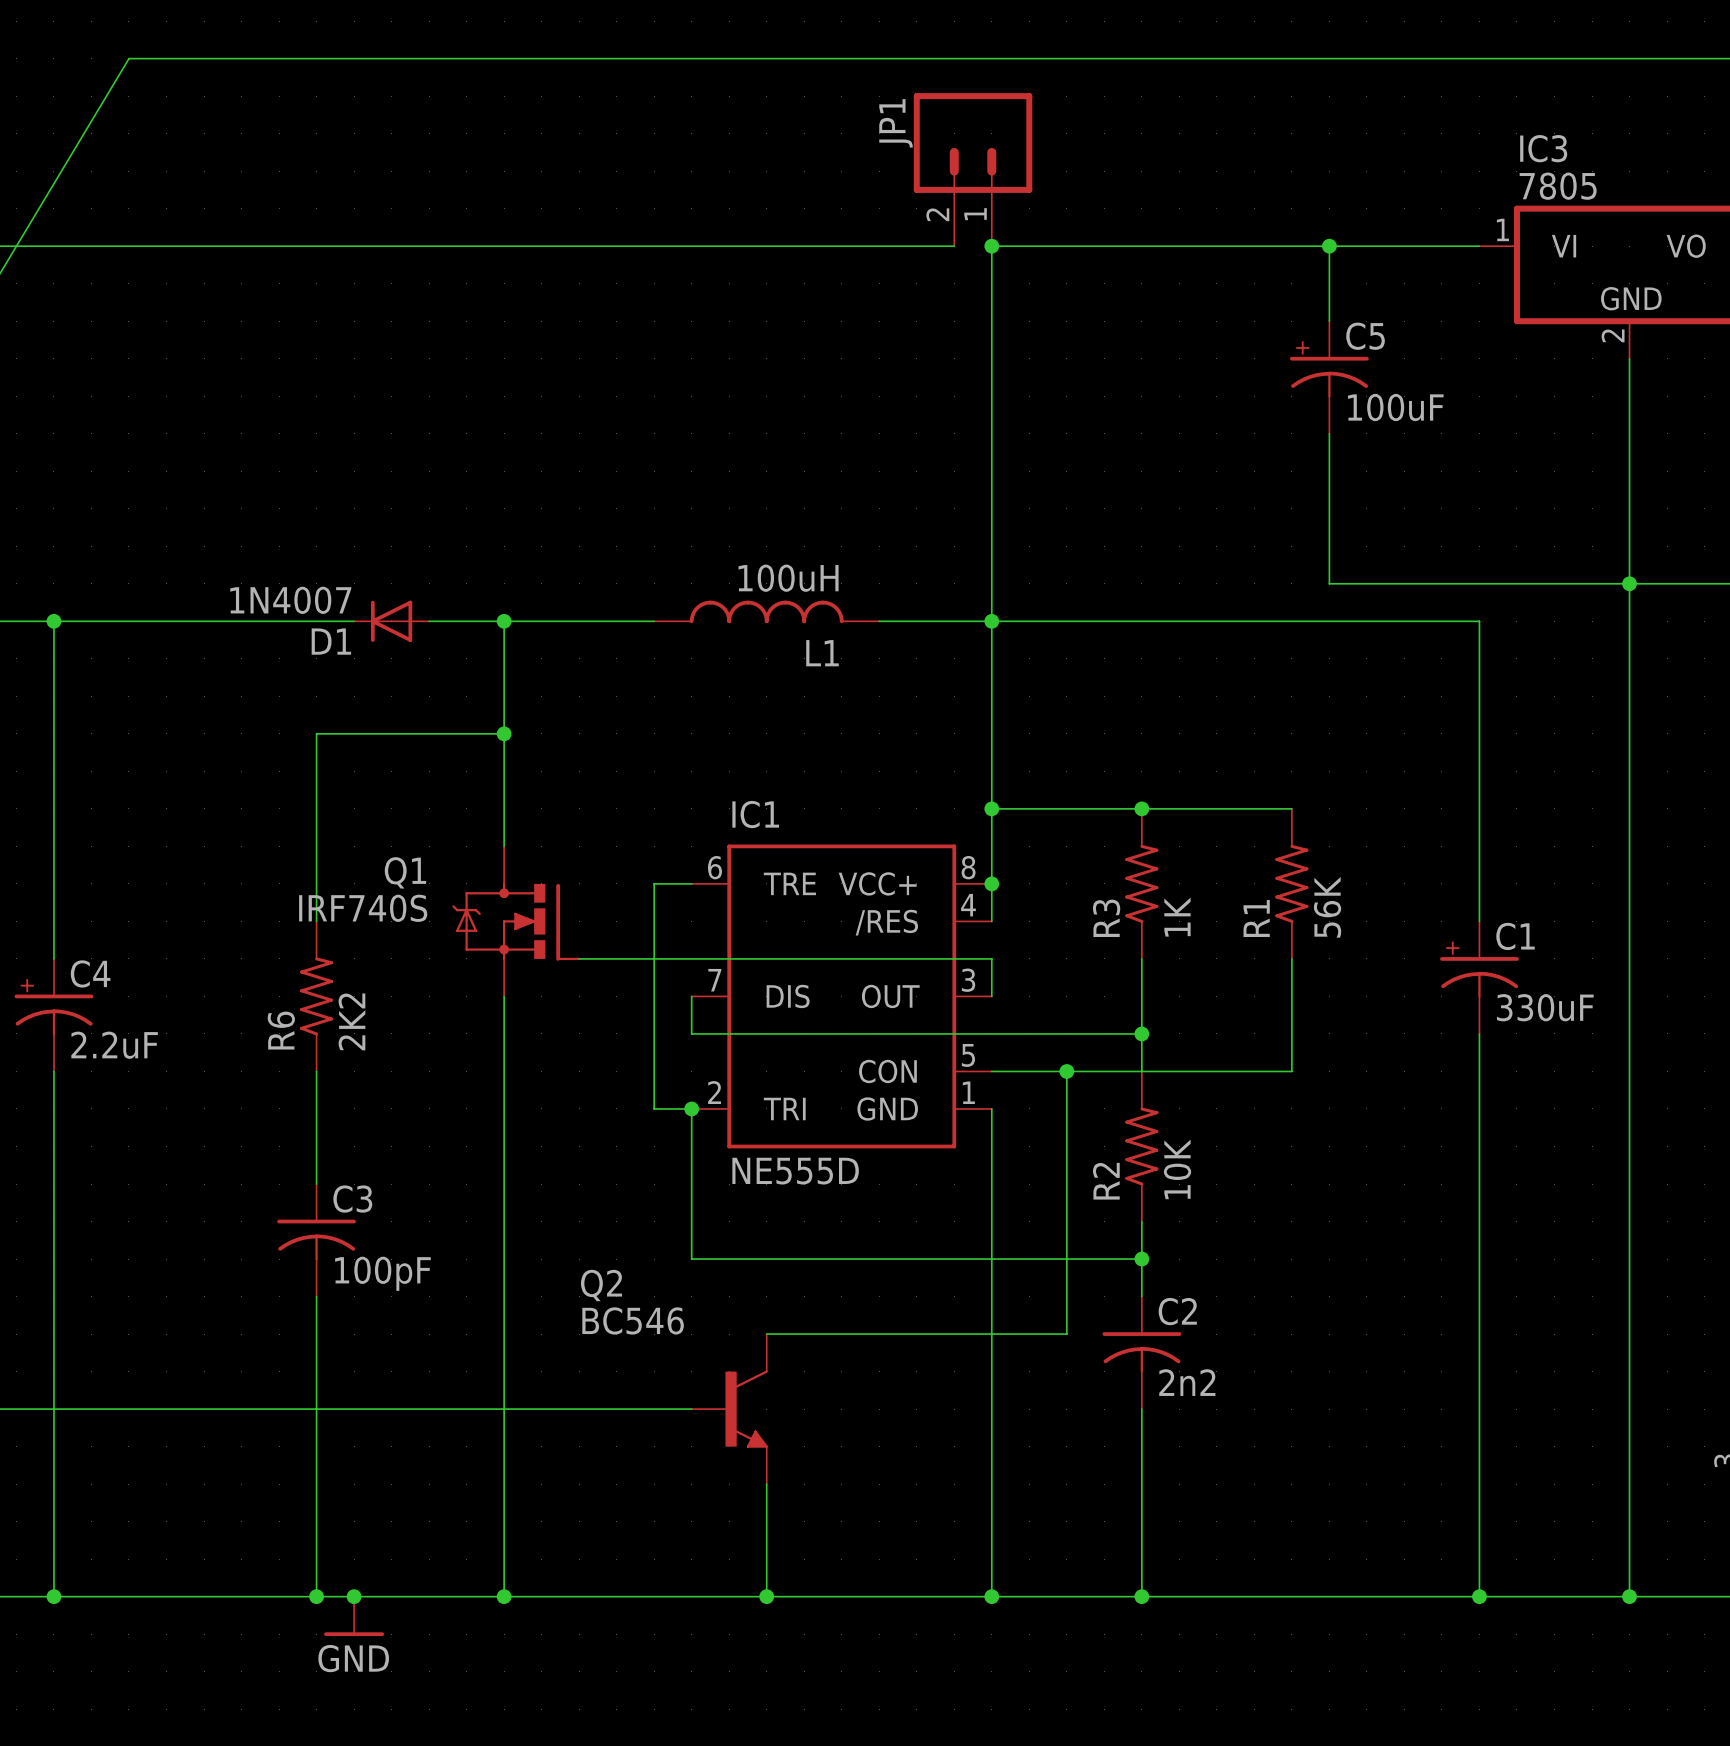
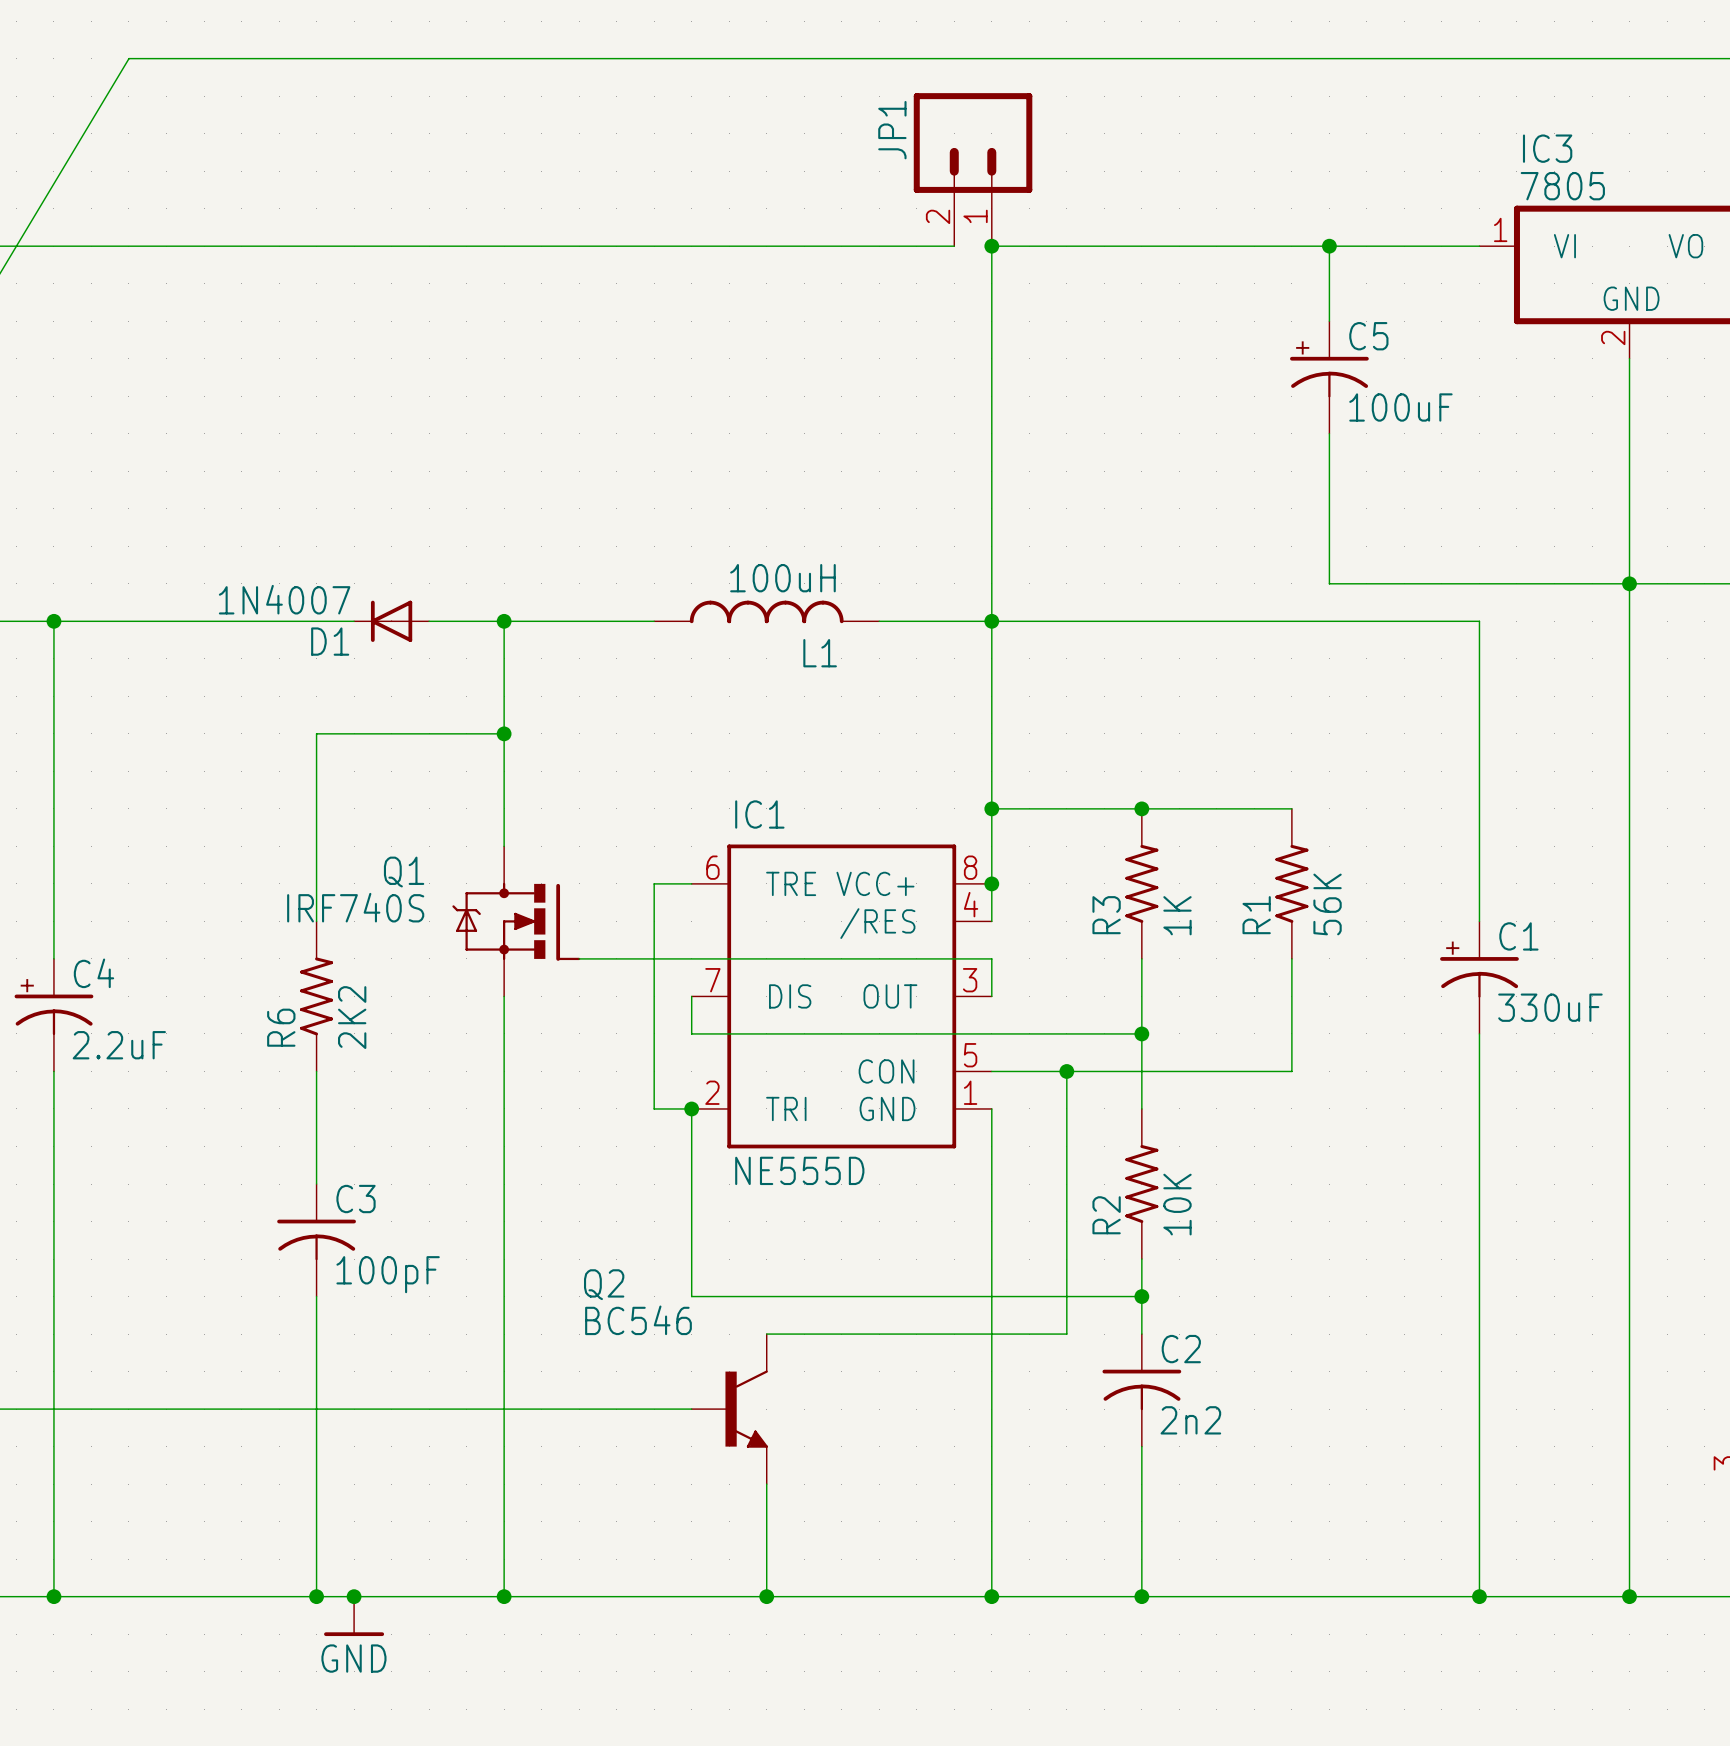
R2 position: (1141, 1146) -> (1141, 1184)
wire: (1141, 1221) (1141, 1259) (691, 1259) -> (1141, 1334) (1141, 1296) (691, 1296) (691, 1259)
junction position: (1141, 1259) -> (1141, 1296)
C2 position: (1141, 1352) -> (1141, 1390)

